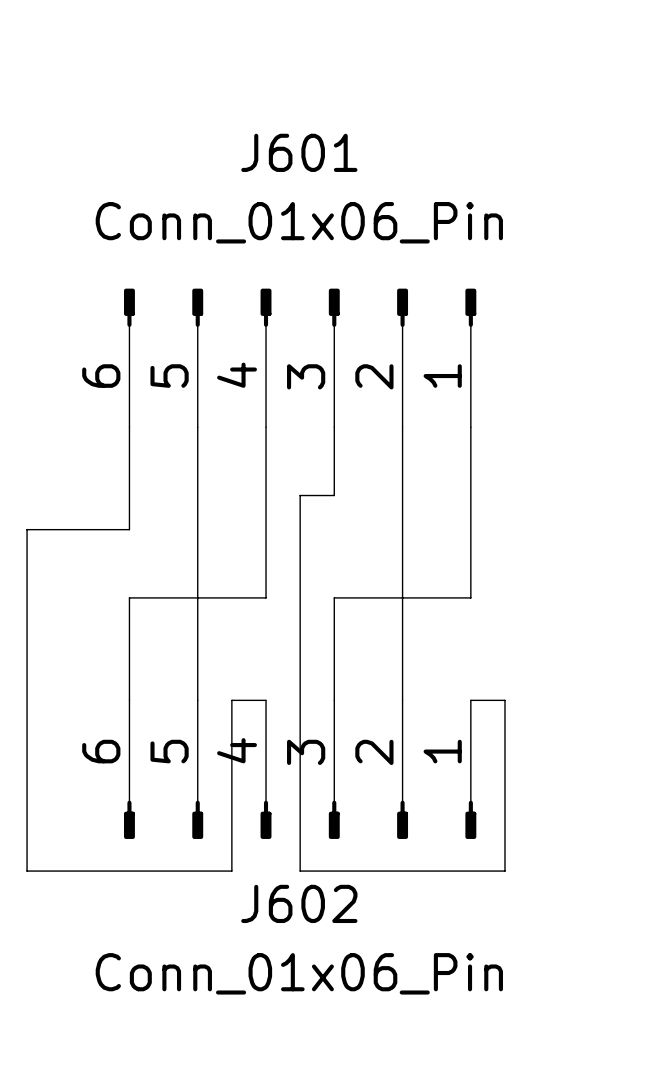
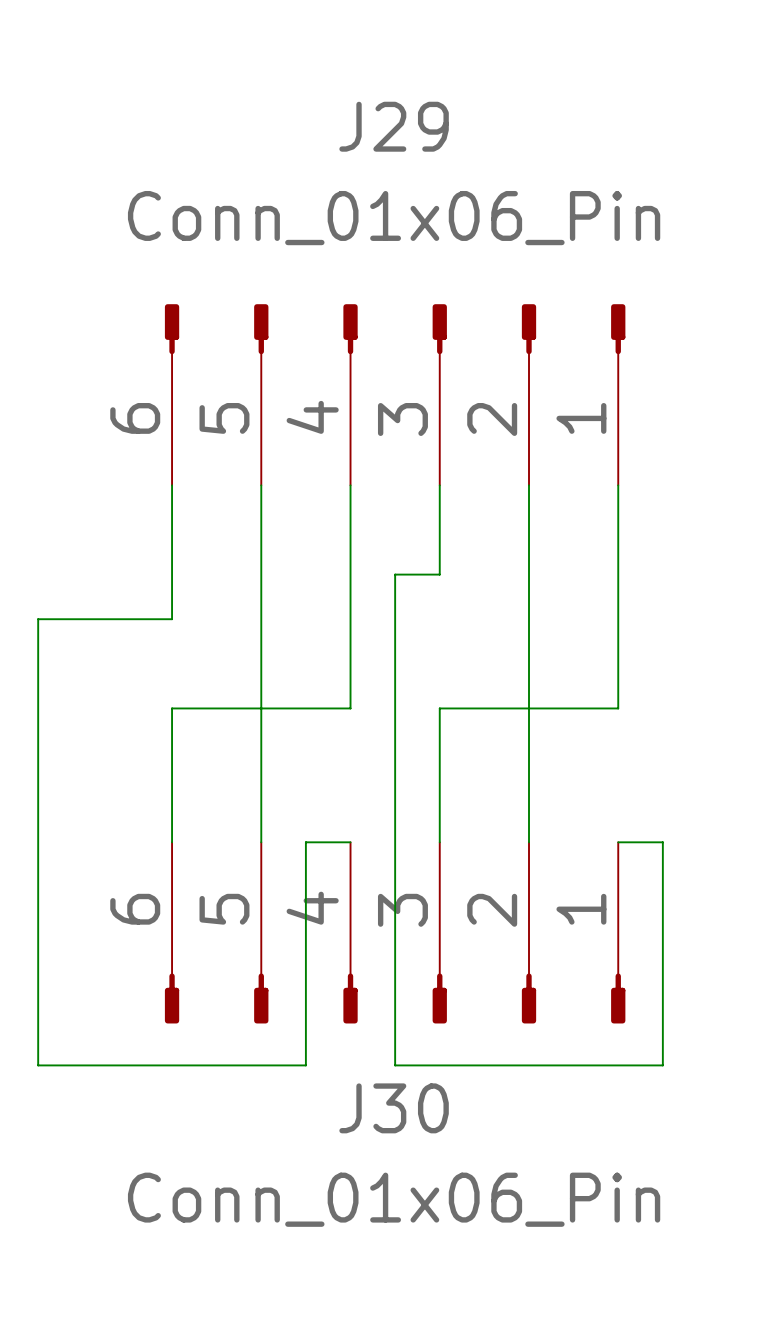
J601 name: J601 (299, 152) -> J29 (394, 126)
J602 name: J602 (299, 903) -> J30 (394, 1108)

